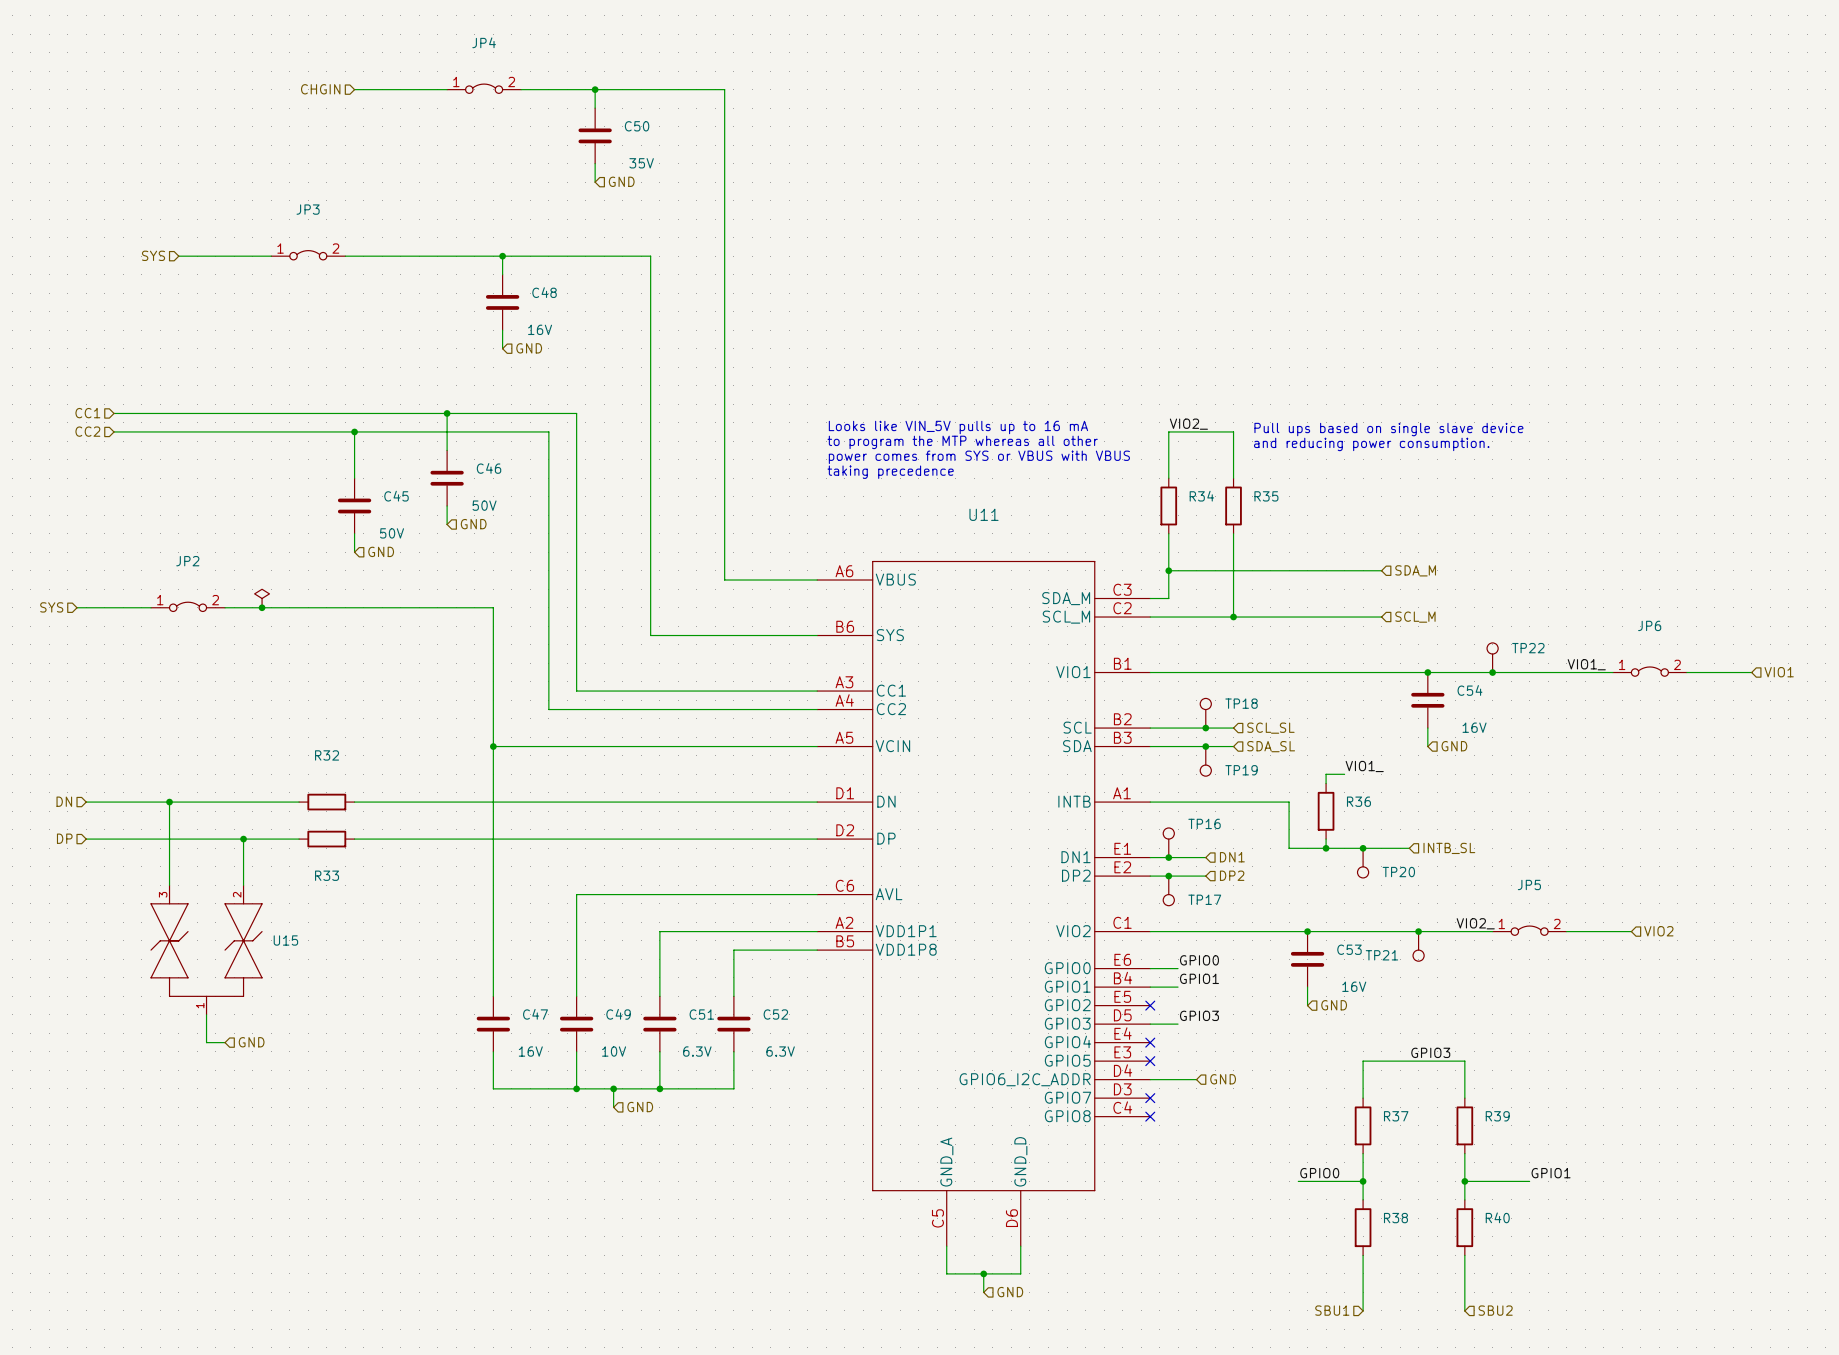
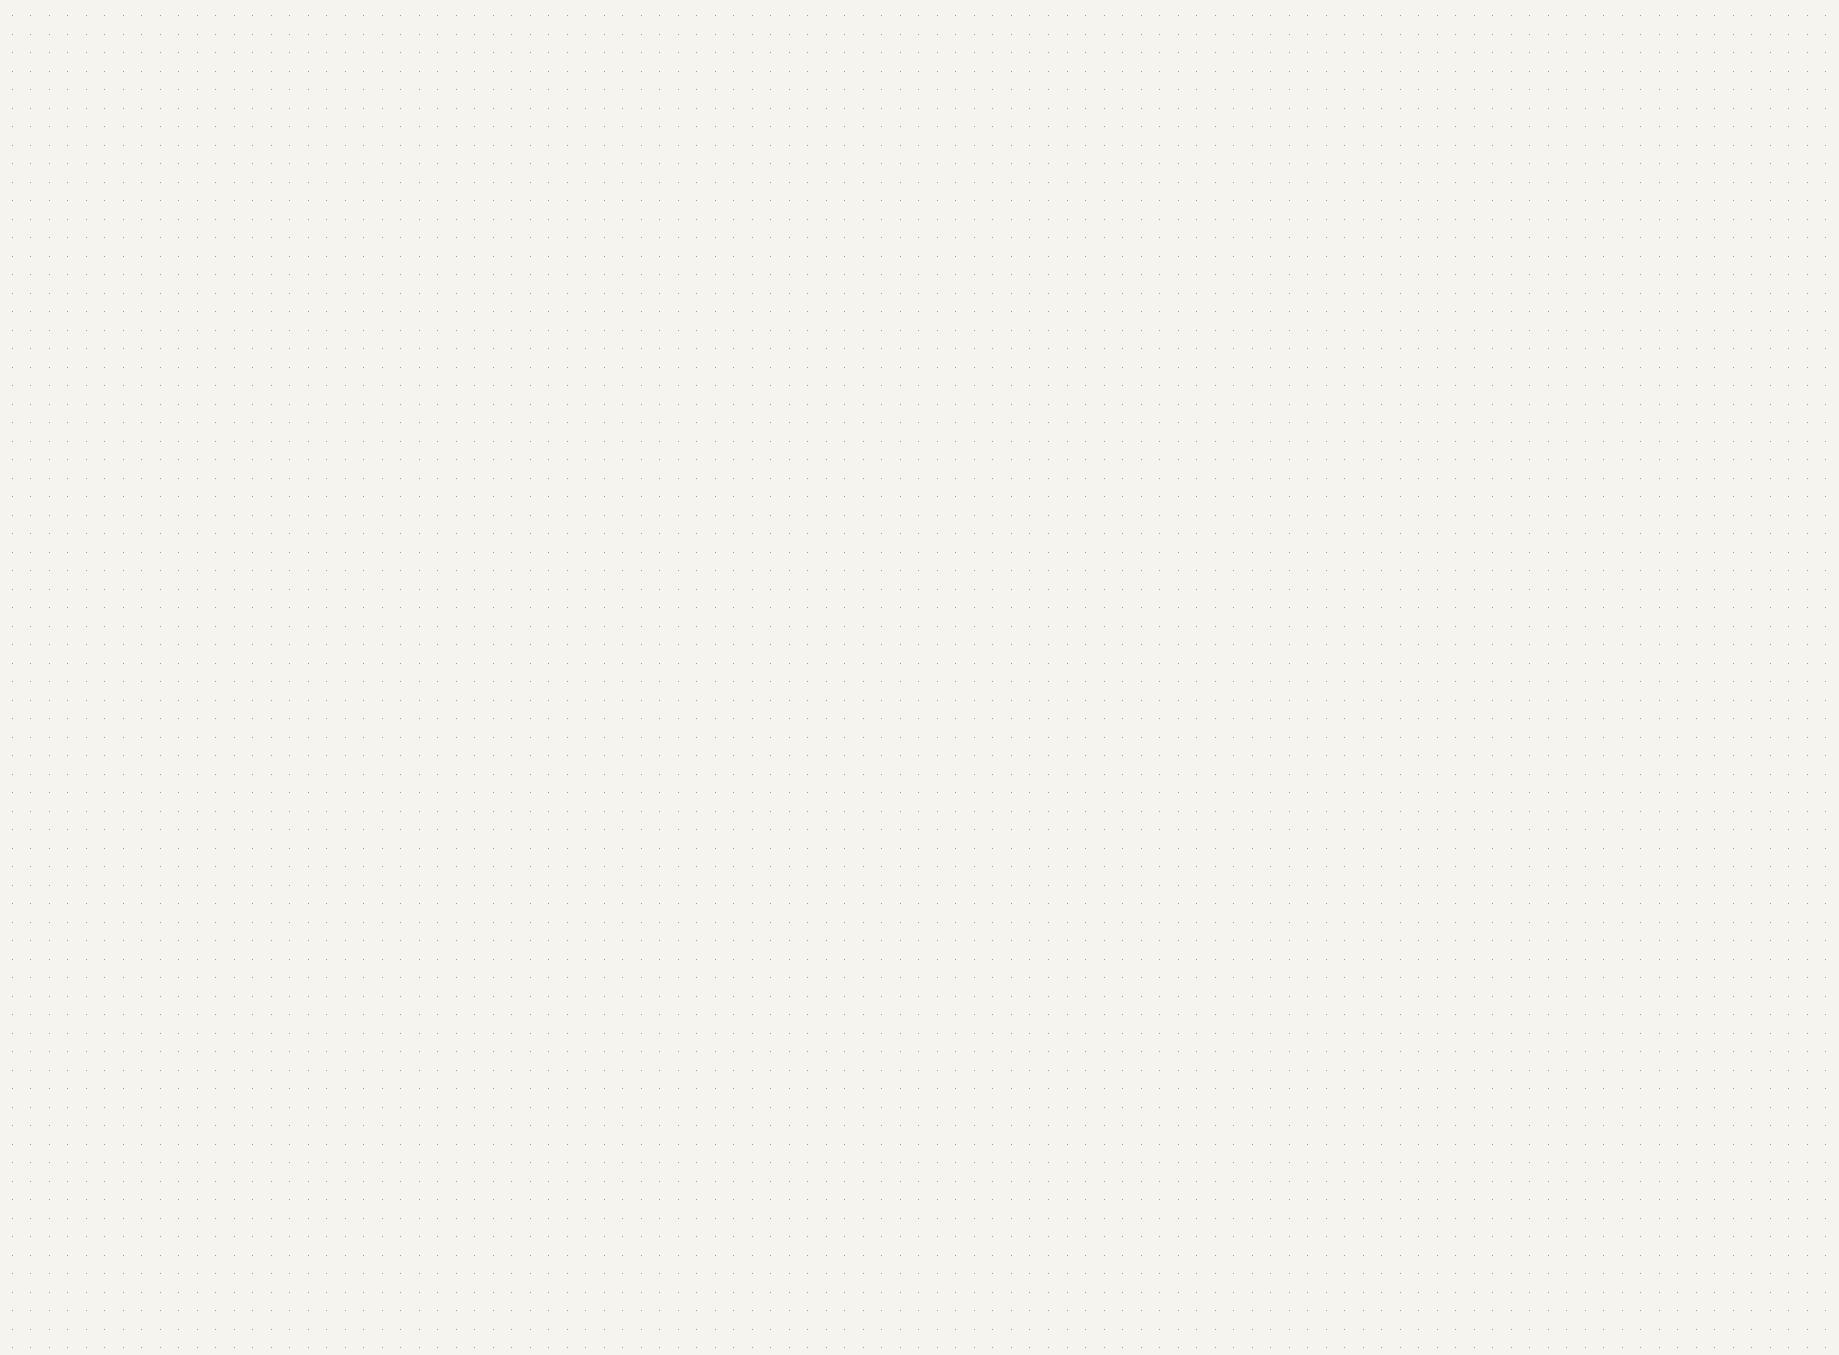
JP4: (484, 88) -> none
hierarchical label: CHGIN (320, 89) -> none
wire: (354, 89) (447, 89) -> none
wire: (521, 89) (724, 89) (724, 580) (817, 580) -> none
wire: (595, 89) (595, 108) -> none
junction: (595, 89) -> none
C50: (595, 135) -> none
wire: (595, 163) (595, 182) -> none
hierarchical label: GND (621, 181) -> none
hierarchical label: SYS (153, 255) -> none
JP3: (308, 255) -> none
wire: (178, 256) (271, 256) -> none
wire: (345, 256) (650, 256) (650, 635) (817, 635) -> none
wire: (502, 256) (502, 274) -> none
junction: (502, 256) -> none
C48: (502, 302) -> none
wire: (502, 330) (502, 348) -> none
hierarchical label: GND (529, 348) -> none
hierarchical label: CC1 (87, 413) -> none
wire: (114, 413) (576, 413) (576, 691) (817, 691) -> none
wire: (447, 413) (447, 450) -> none
junction: (447, 413) -> none
label: VIO2_ (1188, 424) -> none
text: Looks like VIN_5V pulls up to 16 mA (958, 427) -> none
text: Pull ups based on single slave device (1388, 429) -> none
hierarchical label: CC2 (87, 431) -> none
wire: (114, 431) (548, 431) (548, 709) (817, 709) -> none
wire: (354, 431) (354, 478) -> none
junction: (354, 431) -> none
text: to program the MTP whereas all other (962, 442) -> none
text: and reducing power consumption. (1371, 444) -> none
text: power comes from SYS or VBUS with VBUS (979, 457) -> none
text: taking precedence (890, 472) -> none
C46: (447, 478) -> none
wire: (1168, 478) (1168, 431) (1233, 431) (1233, 478) -> none
C45: (354, 505) -> none
wire: (447, 505) (447, 524) -> none
R34: (1168, 505) -> none
R35: (1233, 505) -> none
hierarchical label: GND (473, 524) -> none
wire: (354, 533) (354, 552) -> none
wire: (1168, 533) (1168, 598) (1150, 598) -> none
wire: (1233, 533) (1233, 617) -> none
hierarchical label: GND (381, 551) -> none
wire: (1168, 570) (1381, 570) -> none
junction: (1168, 570) -> none
hierarchical label: SDA_M (1415, 570) -> none
power symbol: (262, 598) -> none
JP2: (188, 606) -> none
hierarchical label: SYS (51, 607) -> none
wire: (77, 607) (151, 607) -> none
wire: (225, 607) (493, 607) (493, 996) -> none
junction: (262, 607) -> none
wire: (1150, 617) (1381, 617) -> none
junction: (1233, 617) -> none
hierarchical label: SCL_M (1415, 617) -> none
TP22: (1492, 657) -> none
label: VIO1_ (1586, 664) -> none
JP6: (1649, 671) -> none
wire: (1150, 672) (1612, 672) -> none
junction: (1427, 672) -> none
junction: (1492, 672) -> none
wire: (1686, 672) (1751, 672) -> none
hierarchical label: VIO1 (1779, 672) -> none
C54: (1427, 700) -> none
TP18: (1205, 713) -> none
wire: (1150, 728) (1233, 728) -> none
junction: (1205, 728) -> none
hierarchical label: SCL_SL (1270, 728) -> none
wire: (1427, 728) (1427, 746) -> none
wire: (493, 746) (817, 746) -> none
junction: (493, 746) -> none
wire: (1150, 746) (1233, 746) -> none
junction: (1205, 746) -> none
hierarchical label: SDA_SL (1271, 746) -> none
hierarchical label: GND (1454, 746) -> none
TP19: (1205, 761) -> none
label: VIO1_ (1364, 766) -> none
wire: (1344, 774) (1326, 774) (1326, 783) -> none
hierarchical label: DN (64, 801) -> none
wire: (86, 802) (299, 802) -> none
wire: (169, 802) (169, 885) -> none
junction: (169, 802) -> none
R32: (326, 802) -> none
wire: (354, 802) (817, 802) -> none
wire: (1150, 802) (1289, 802) (1289, 848) (1409, 848) -> none
R36: (1326, 811) -> none
hierarchical label: DP (64, 838) -> none
wire: (86, 839) (299, 839) -> none
wire: (243, 839) (243, 885) -> none
junction: (243, 839) -> none
R33: (326, 839) -> none
wire: (354, 839) (817, 839) -> none
wire: (1326, 839) (1326, 848) -> none
TP16: (1168, 842) -> none
junction: (1326, 848) -> none
junction: (1363, 848) -> none
hierarchical label: INTB_SL (1449, 848) -> none
wire: (1150, 857) (1205, 857) -> none
junction: (1168, 857) -> none
hierarchical label: DN1 (1232, 857) -> none
TP20: (1363, 863) -> none
hierarchical label: DP2 (1232, 875) -> none
wire: (1150, 876) (1205, 876) -> none
junction: (1168, 876) -> none
TP17: (1168, 890) -> none
wire: (817, 894) (576, 894) (576, 996) -> none
U11: (983, 903) -> none
label: VIO2_ (1475, 923) -> none
JP5: (1529, 930) -> none
wire: (817, 931) (659, 931) (659, 996) -> none
wire: (1150, 931) (1492, 931) -> none
junction: (1307, 931) -> none
junction: (1418, 931) -> none
wire: (1566, 931) (1631, 931) -> none
hierarchical label: VIO2 (1658, 931) -> none
TP21: (1418, 946) -> none
U15: (206, 950) -> none
wire: (817, 950) (733, 950) (733, 996) -> none
C53: (1307, 959) -> none
label: GPIO0 (1199, 960) -> none
wire: (1150, 968) (1178, 968) -> none
label: GPIO1 (1199, 978) -> none
wire: (1150, 987) (1178, 987) -> none
wire: (1307, 987) (1307, 1005) -> none
no-connect mark: (1150, 1005) -> none
hierarchical label: GND (1334, 1005) -> none
wire: (206, 1014) (206, 1042) (225, 1042) -> none
label: GPIO3 (1199, 1015) -> none
C47: (493, 1024) -> none
C49: (576, 1024) -> none
C51: (659, 1024) -> none
C52: (733, 1024) -> none
wire: (1150, 1024) (1178, 1024) -> none
hierarchical label: GND (251, 1042) -> none
no-connect mark: (1150, 1042) -> none
wire: (493, 1051) (493, 1088) (733, 1088) (733, 1051) -> none
wire: (576, 1051) (576, 1088) -> none
wire: (659, 1051) (659, 1088) -> none
label: GPIO3 (1430, 1052) -> none
no-connect mark: (1150, 1061) -> none
wire: (1150, 1079) (1196, 1079) -> none
hierarchical label: GND (1223, 1079) -> none
junction: (576, 1088) -> none
wire: (613, 1088) (613, 1107) -> none
junction: (613, 1088) -> none
junction: (659, 1088) -> none
no-connect mark: (1150, 1098) -> none
wire: (1363, 1098) (1363, 1061) (1464, 1061) (1464, 1098) -> none
hierarchical label: GND (640, 1107) -> none
no-connect mark: (1150, 1116) -> none
R37: (1363, 1125) -> none
R39: (1464, 1125) -> none
wire: (1363, 1153) (1363, 1199) -> none
wire: (1464, 1153) (1464, 1199) -> none
label: GPIO0 (1319, 1173) -> none
label: GPIO1 (1551, 1173) -> none
wire: (1298, 1181) (1363, 1181) -> none
junction: (1363, 1181) -> none
wire: (1464, 1181) (1529, 1181) -> none
junction: (1464, 1181) -> none
R38: (1363, 1227) -> none
R40: (1464, 1227) -> none
wire: (946, 1246) (946, 1273) (1020, 1273) (1020, 1246) -> none
wire: (1363, 1255) (1363, 1310) -> none
wire: (1464, 1255) (1464, 1310) -> none
wire: (983, 1273) (983, 1292) -> none
junction: (983, 1273) -> none
hierarchical label: GND (1010, 1292) -> none
hierarchical label: SBU1 (1332, 1310) -> none
hierarchical label: SBU2 (1495, 1310) -> none

